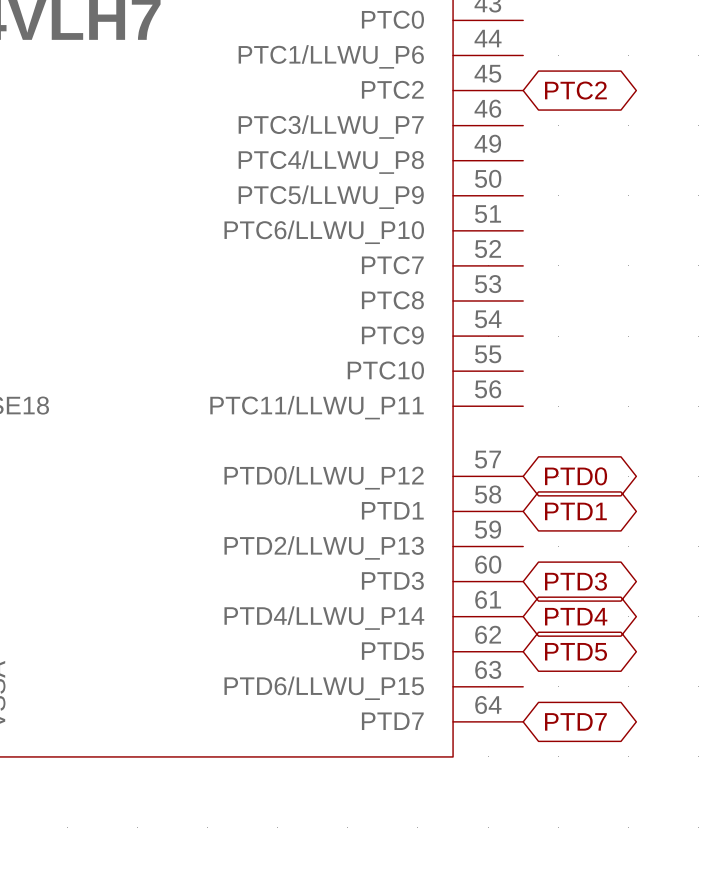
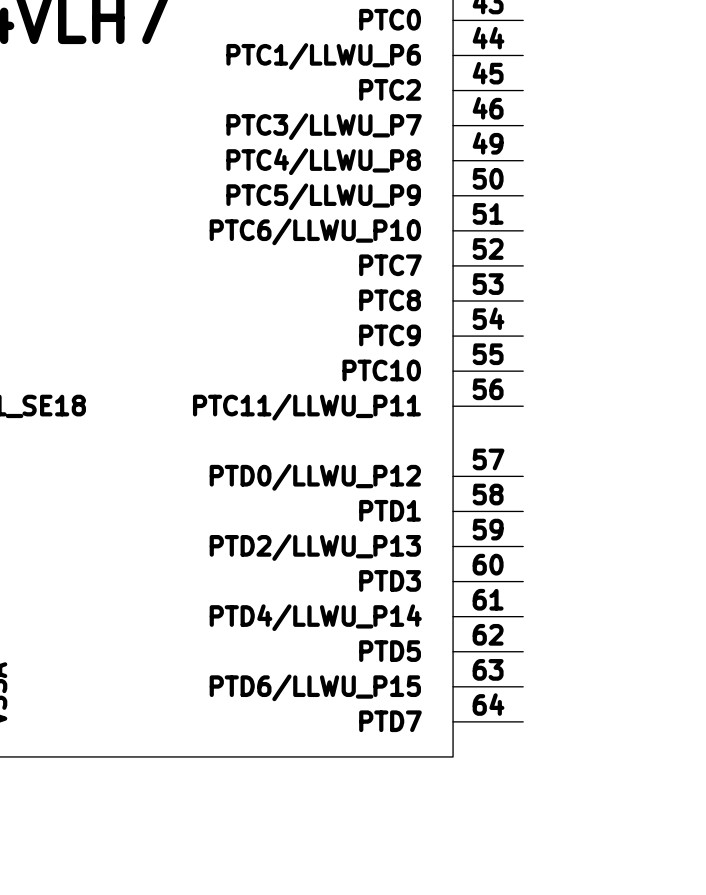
global label: PTC2 (575, 90) -> none
global label: PTD0 (576, 476) -> none
global label: PTD1 (575, 511) -> none
global label: PTD3 (575, 581) -> none
global label: PTD4 (576, 616) -> none
global label: PTD5 (576, 651) -> none
global label: PTD7 (575, 721) -> none

